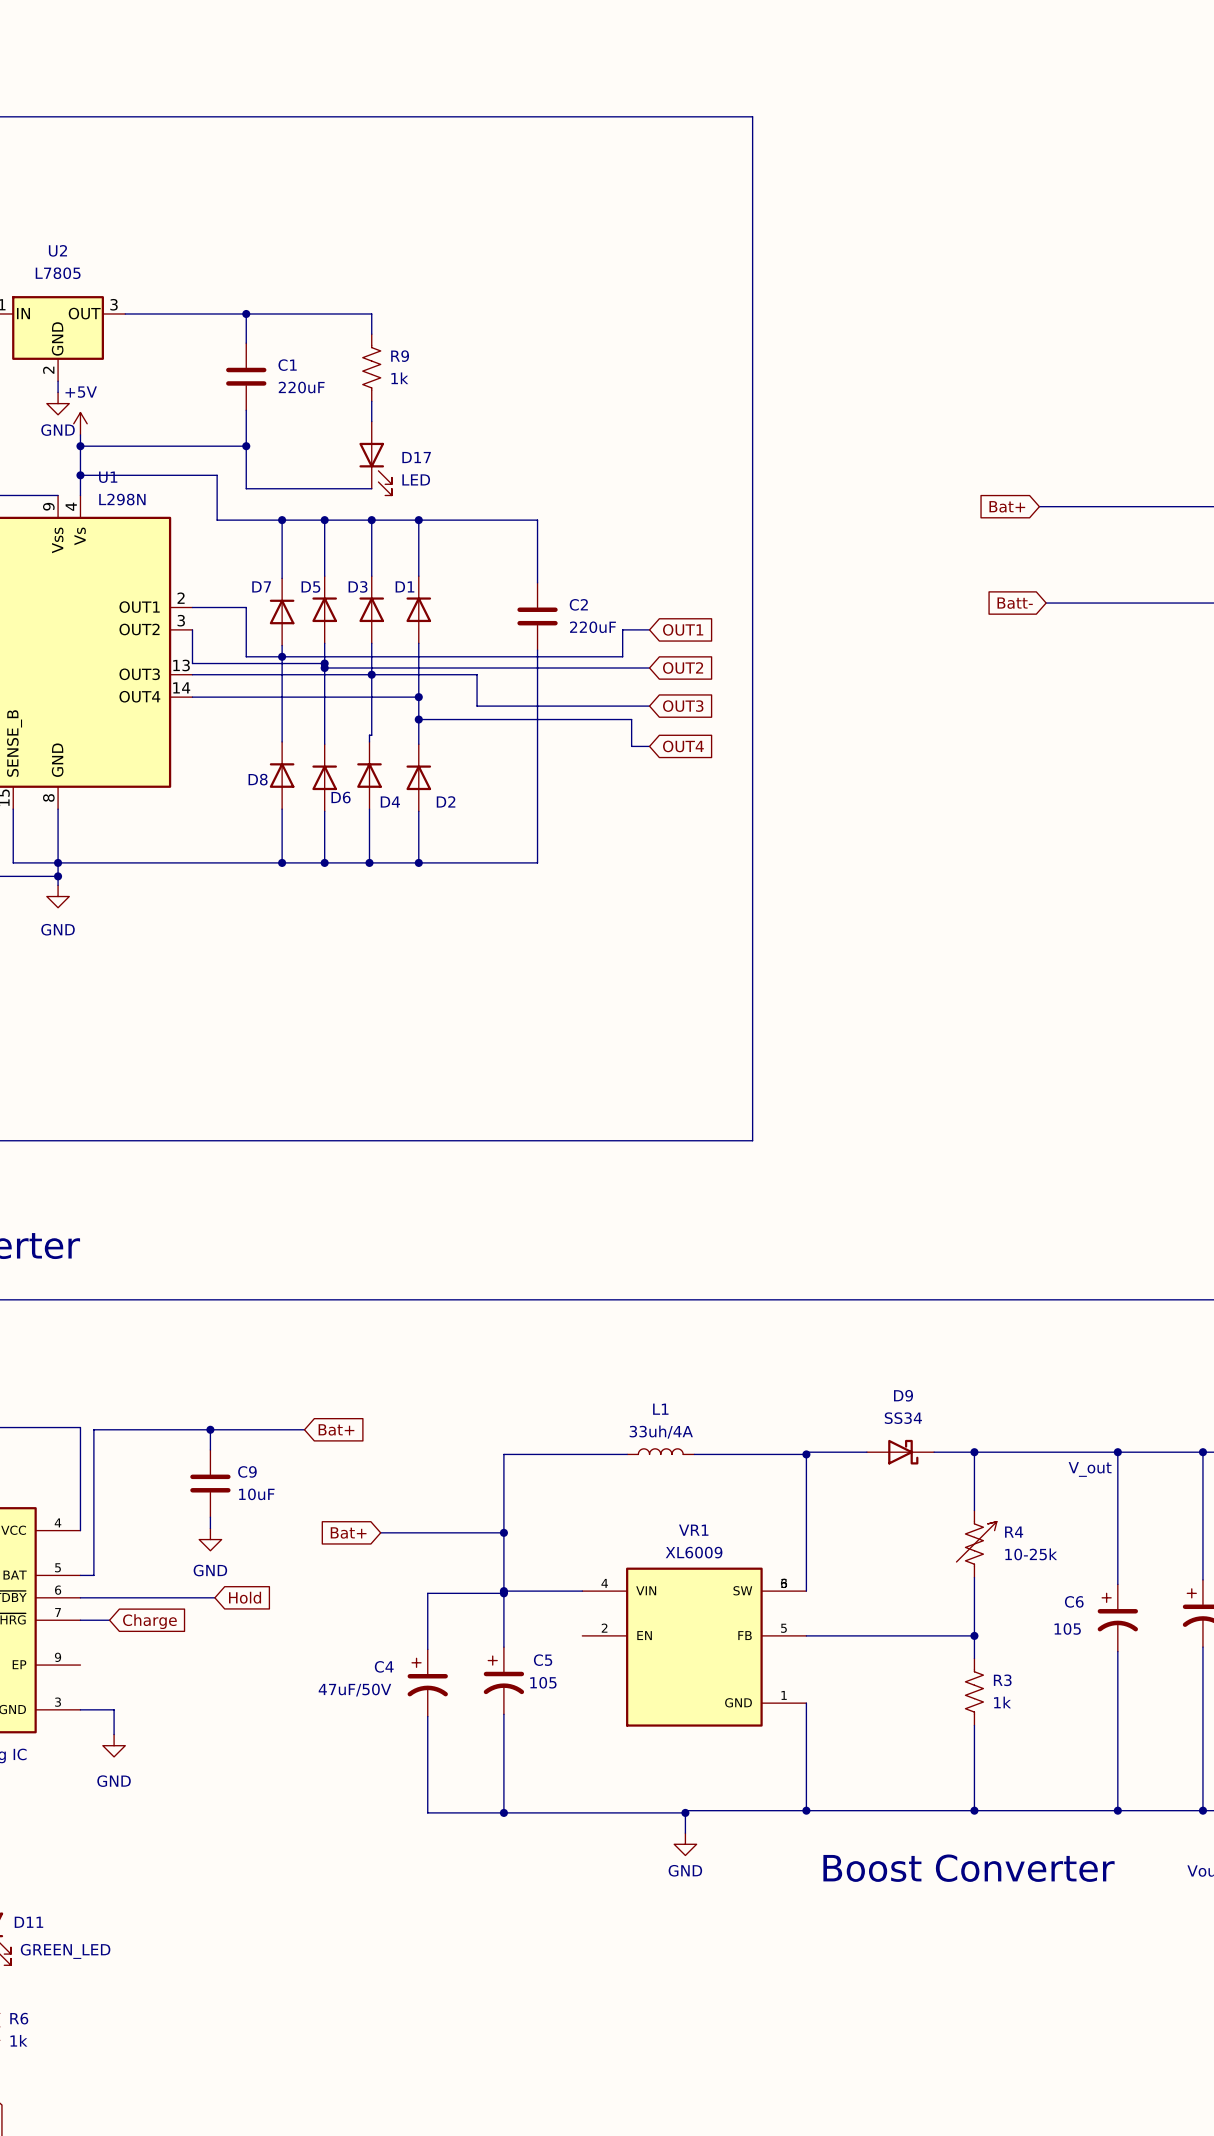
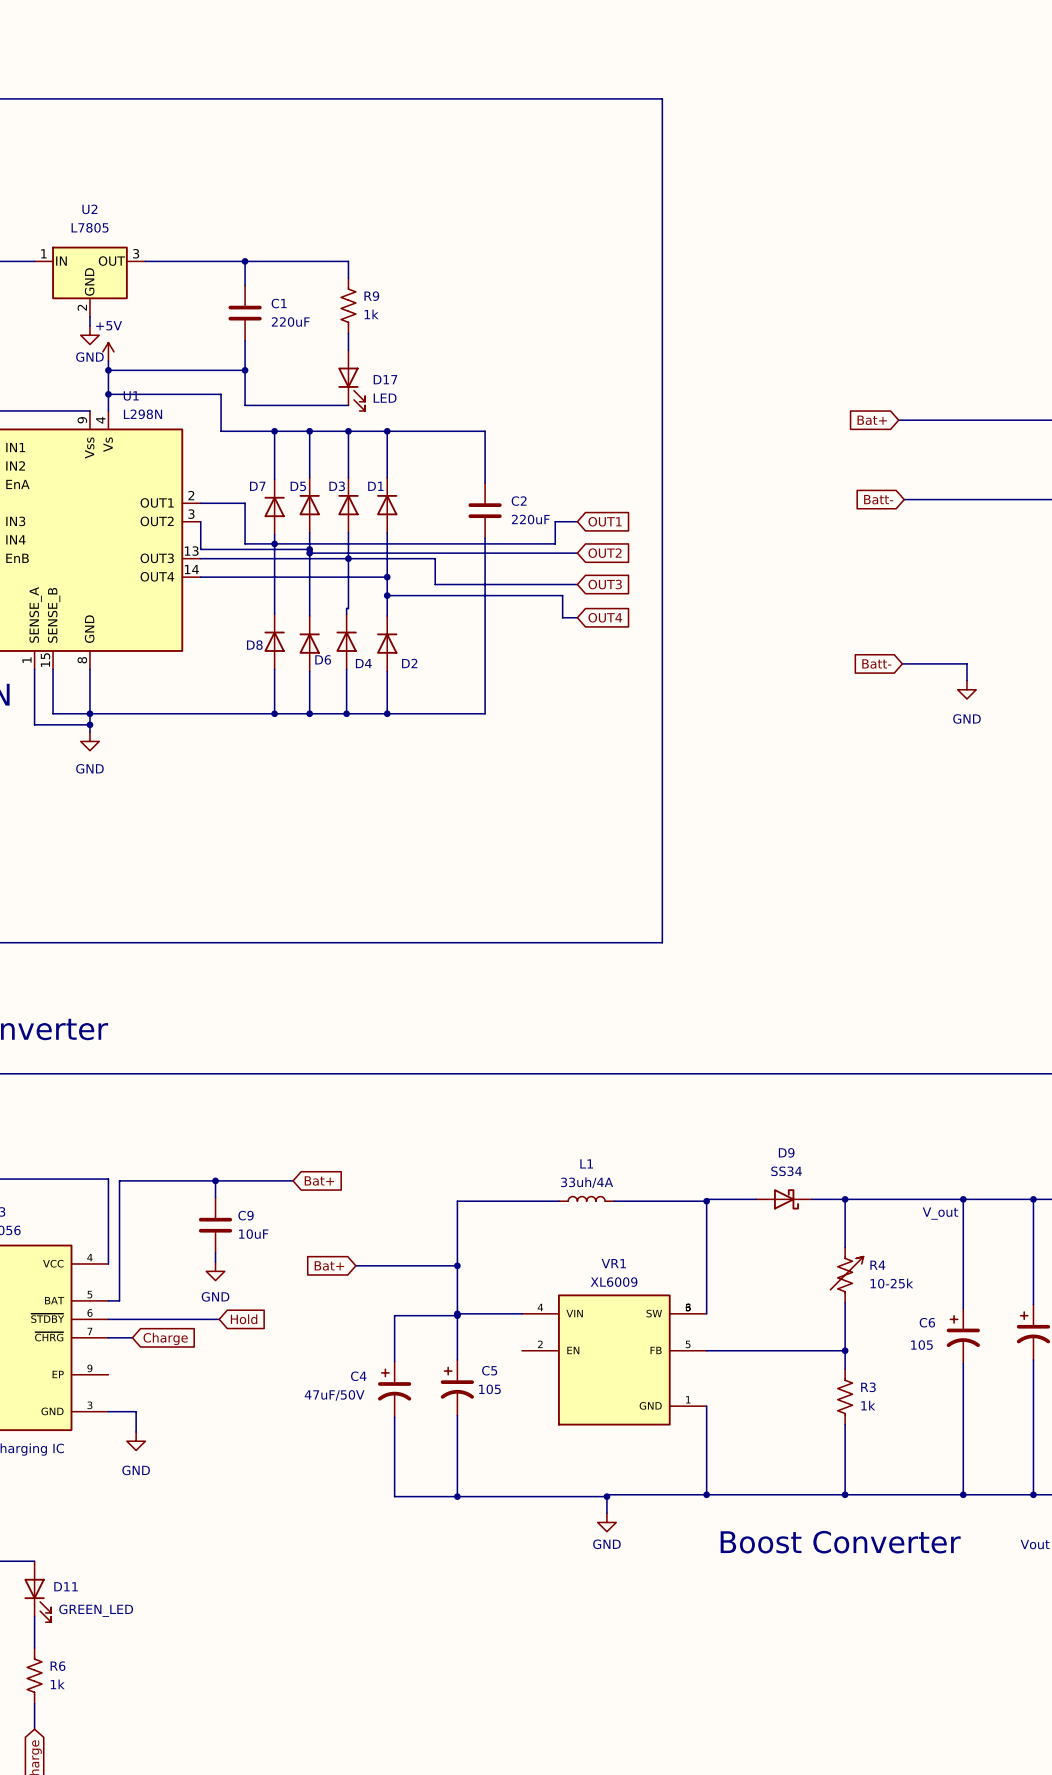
global label: none -> Batt- (876, 664)
wire: none -> (902, 663) (966, 663) (966, 680)
power symbol: none -> GND (966, 689)

